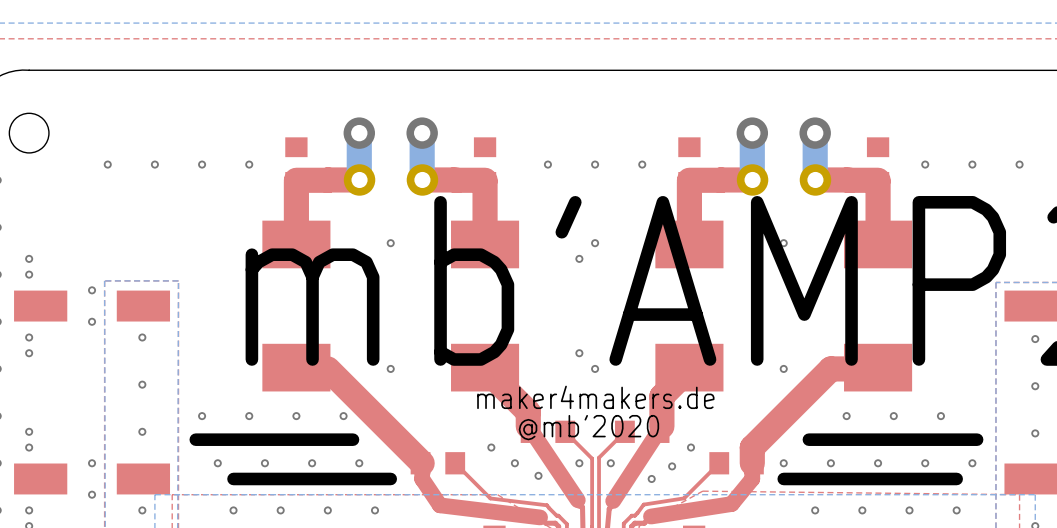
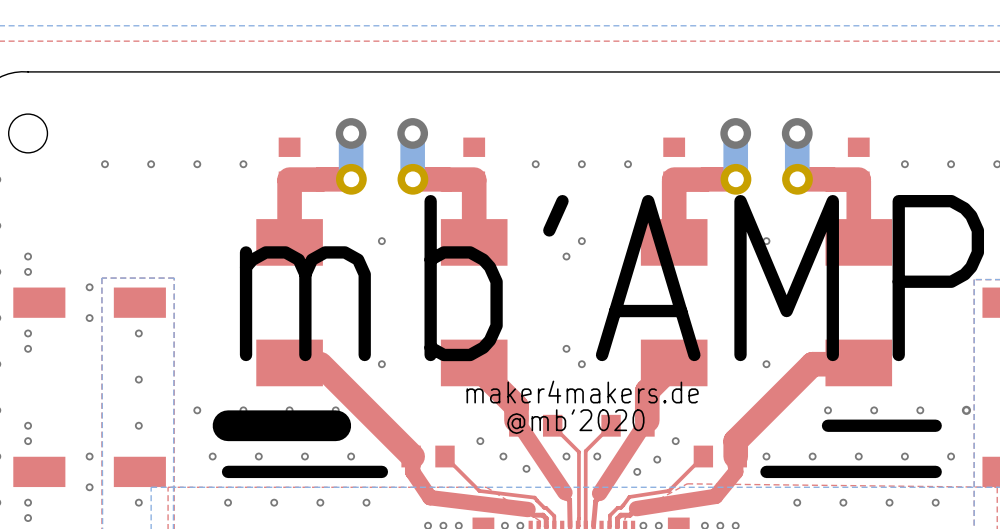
via: none -> (966, 410)
board edge: none -> (335, 425) (228, 425)
board edge: none -> (935, 425) (828, 425)
board edge: (353, 439) (195, 439) -> none
board edge: (977, 439) (808, 439) -> none

